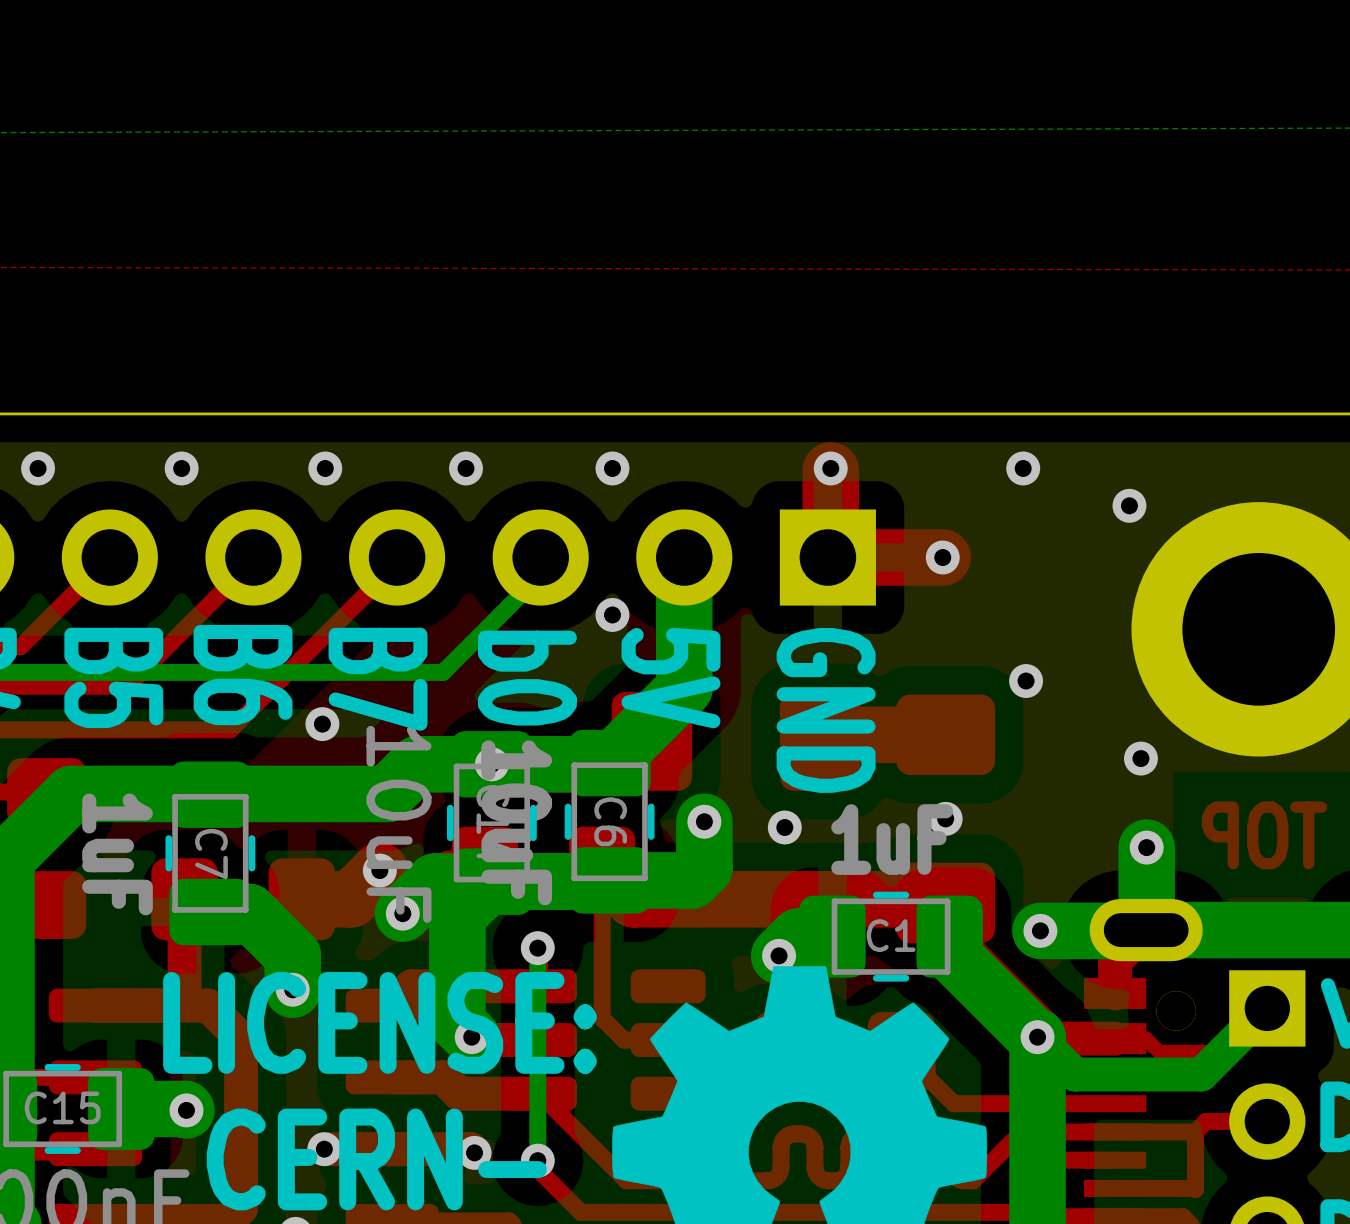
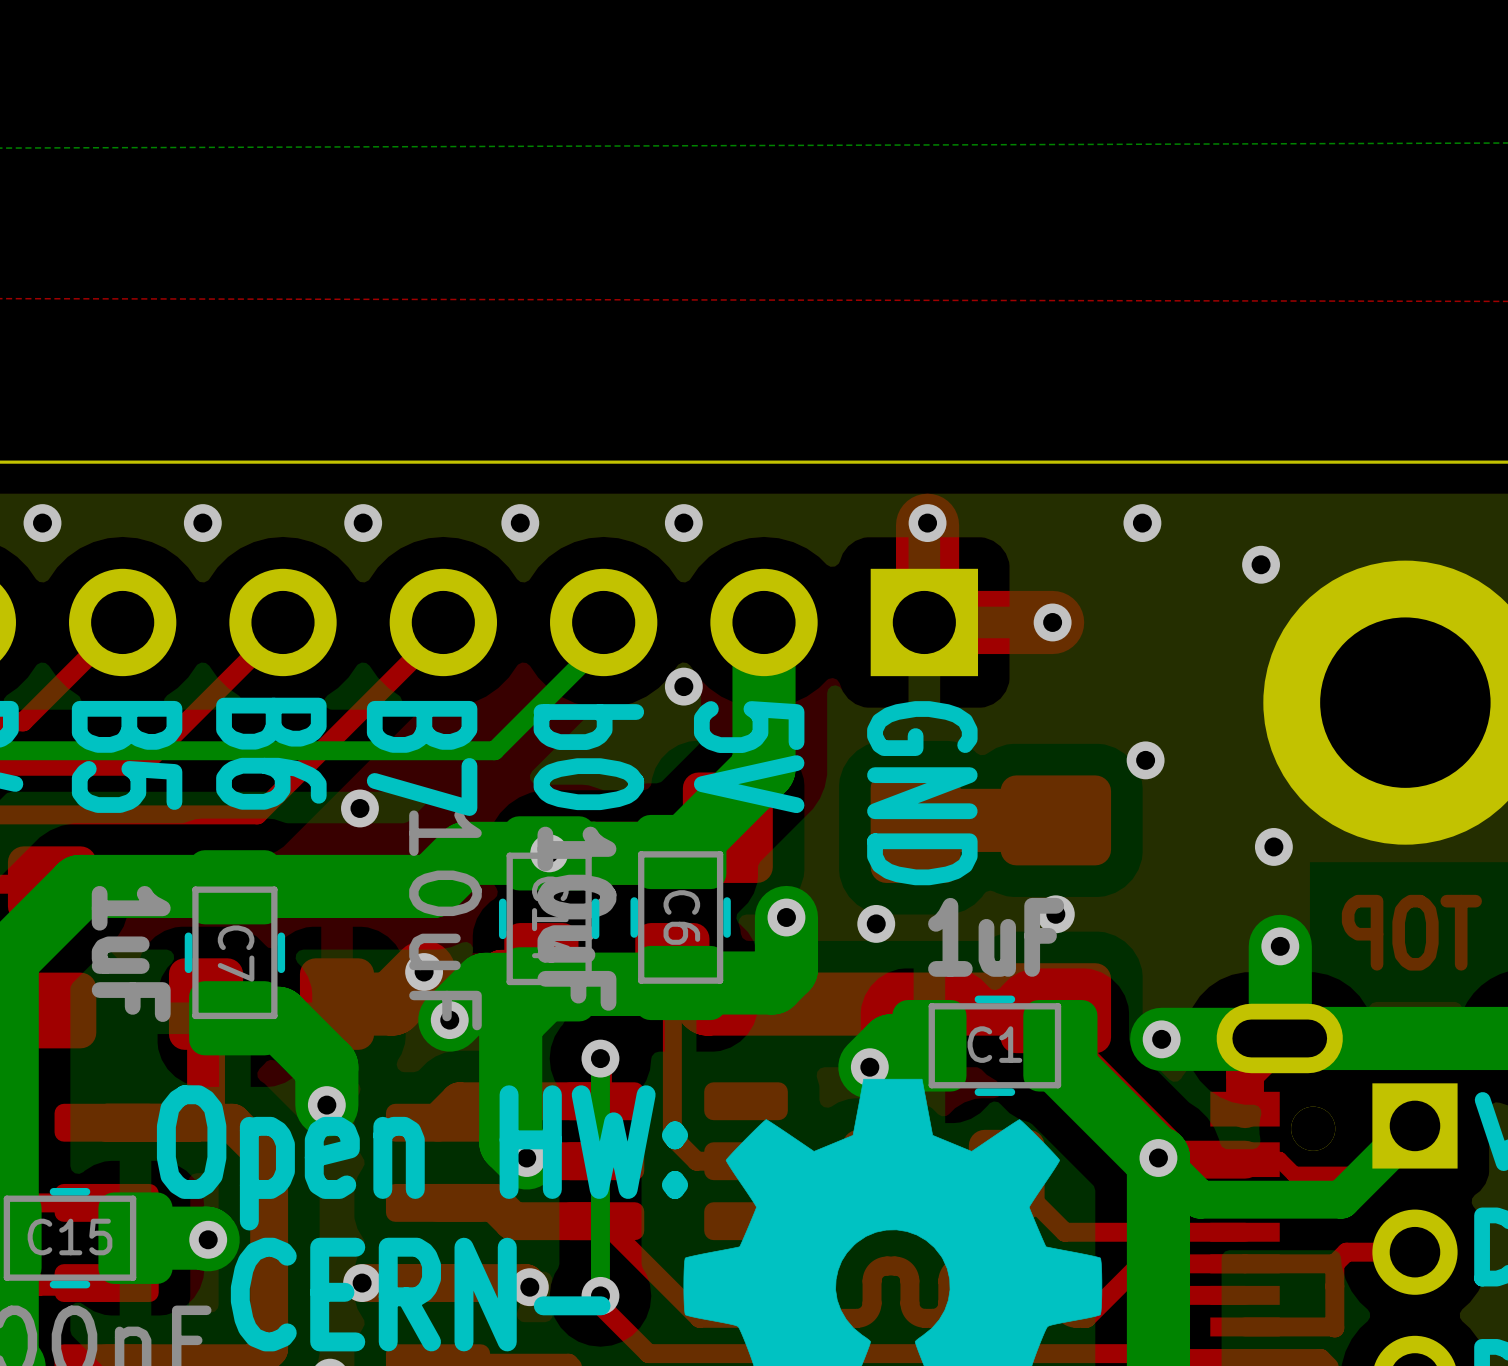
text: LICENSE: (380, 1022) -> Open HW: (422, 1157)

